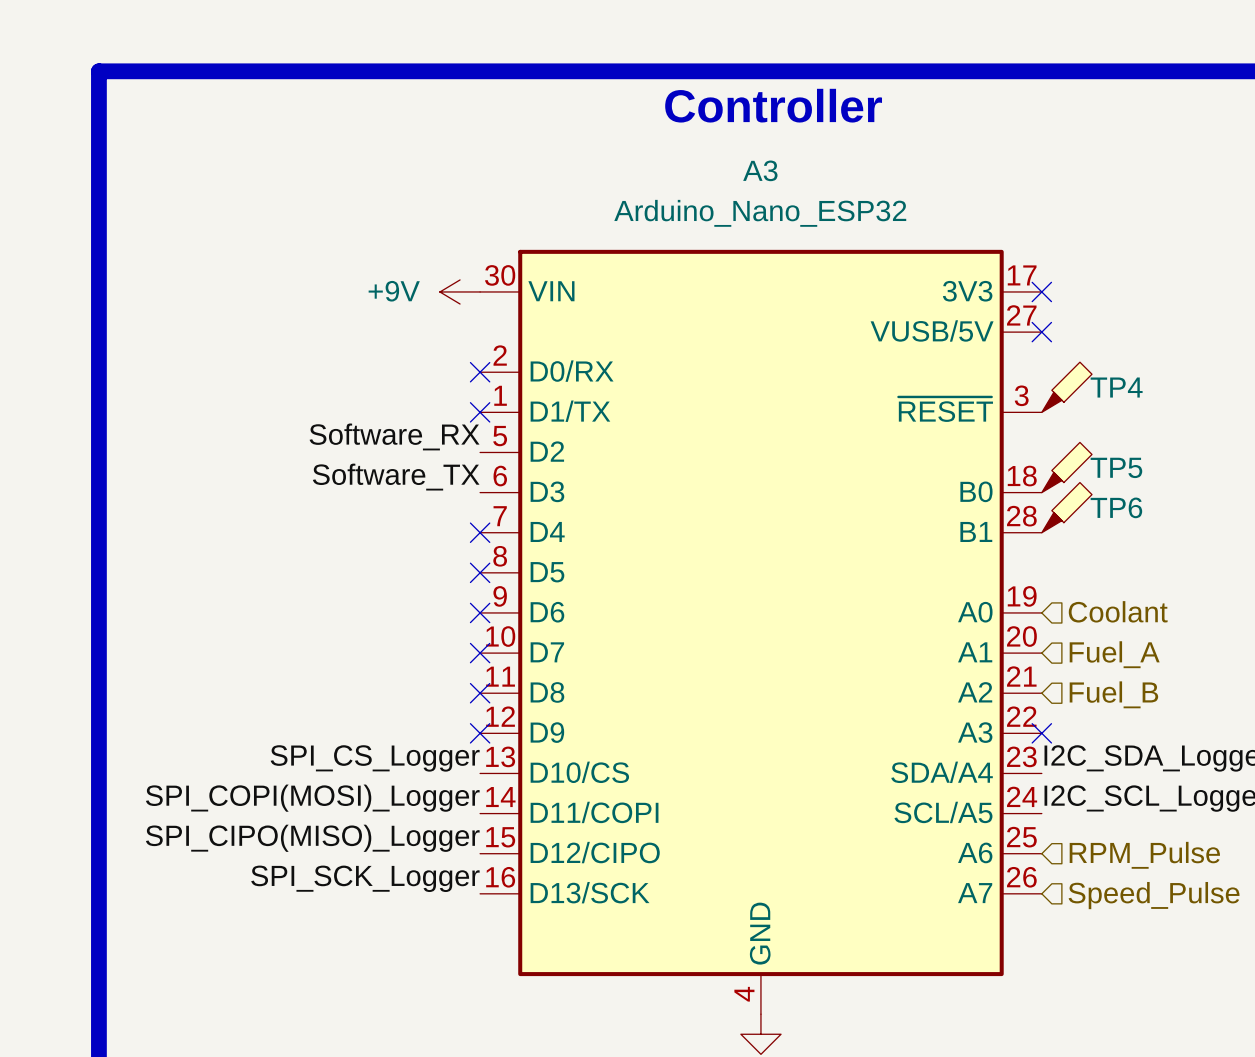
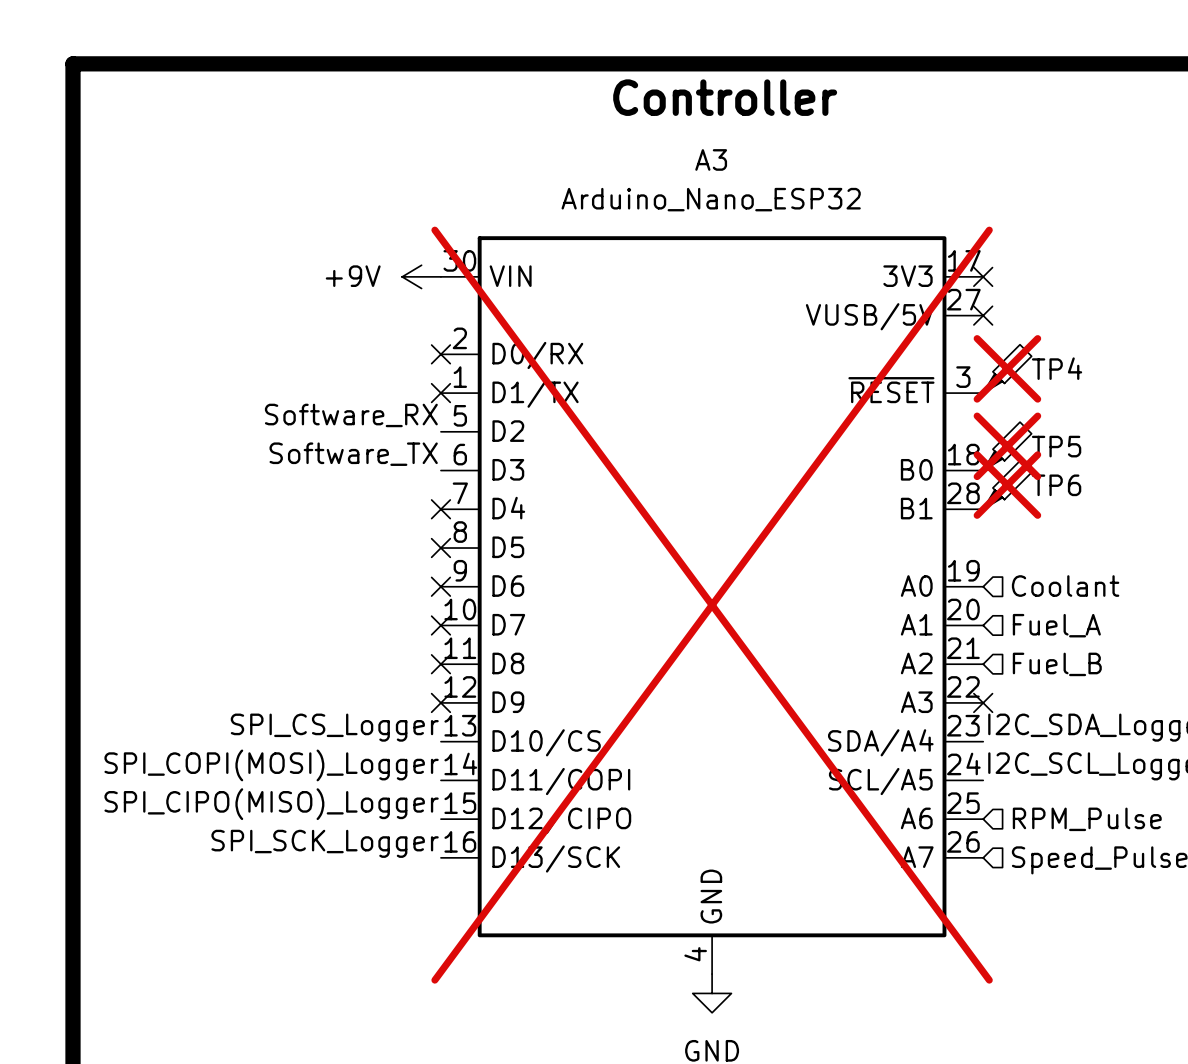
TP4 do-not-place cross: none -> (1007, 368)
TP5 do-not-place cross: none -> (1007, 446)
TP6 do-not-place cross: none -> (1007, 485)
A3 do-not-place cross: none -> (712, 605)

